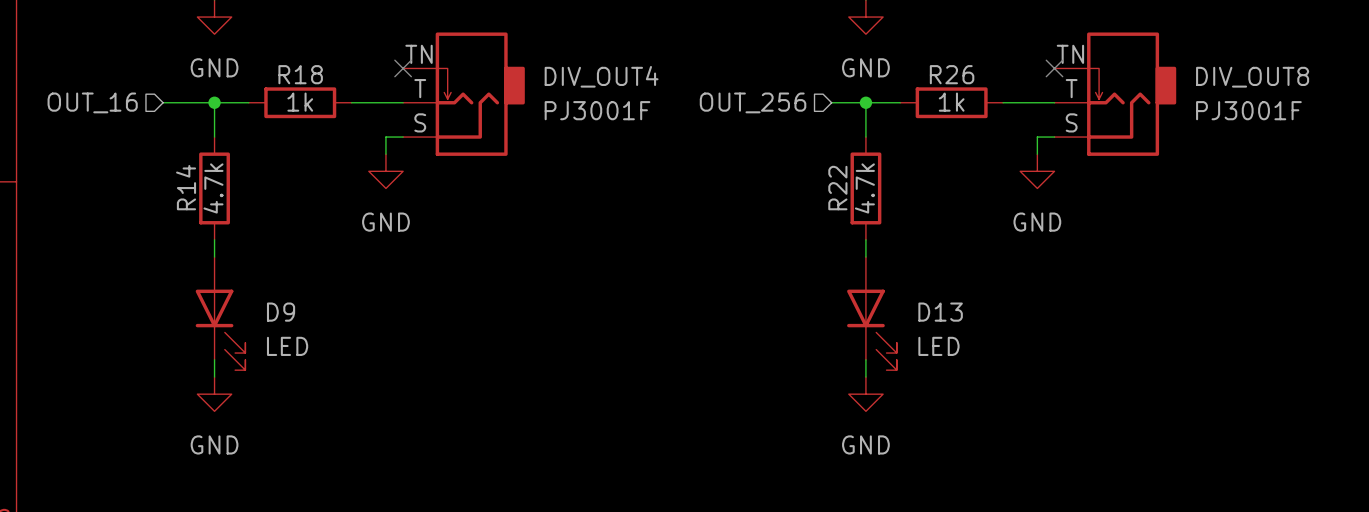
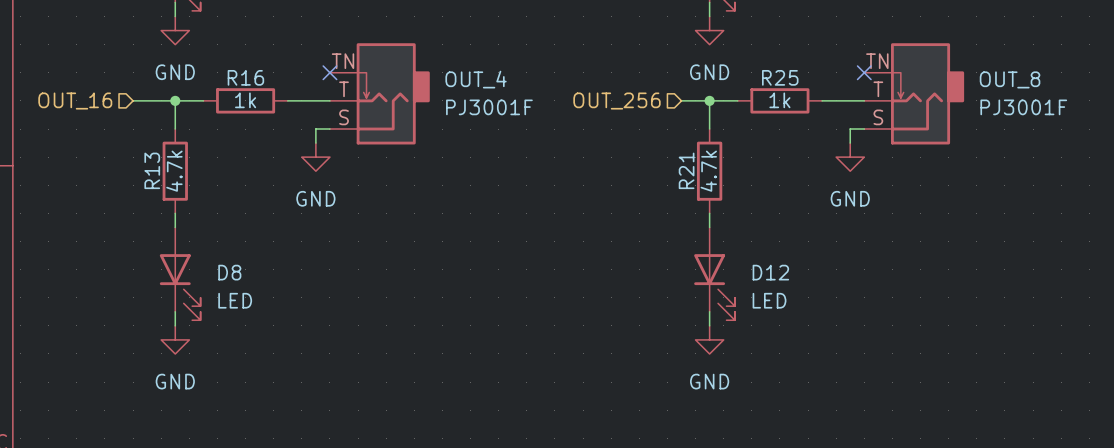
R18 name: R18 (300, 74) -> R16 (245, 77)
R26 name: R26 (952, 74) -> R25 (780, 77)
DIV_OUT4 name: DIV_OUT4 (601, 76) -> OUT_4 (476, 79)
DIV_OUT8 name: DIV_OUT8 (1252, 77) -> OUT_8 (1010, 79)
R14 name: R14 (186, 187) -> R13 (152, 170)
R22 name: R22 (837, 188) -> R21 (686, 170)
D9 name: D9 (281, 312) -> D8 (229, 272)
D13 name: D13 (940, 312) -> D12 (770, 272)

